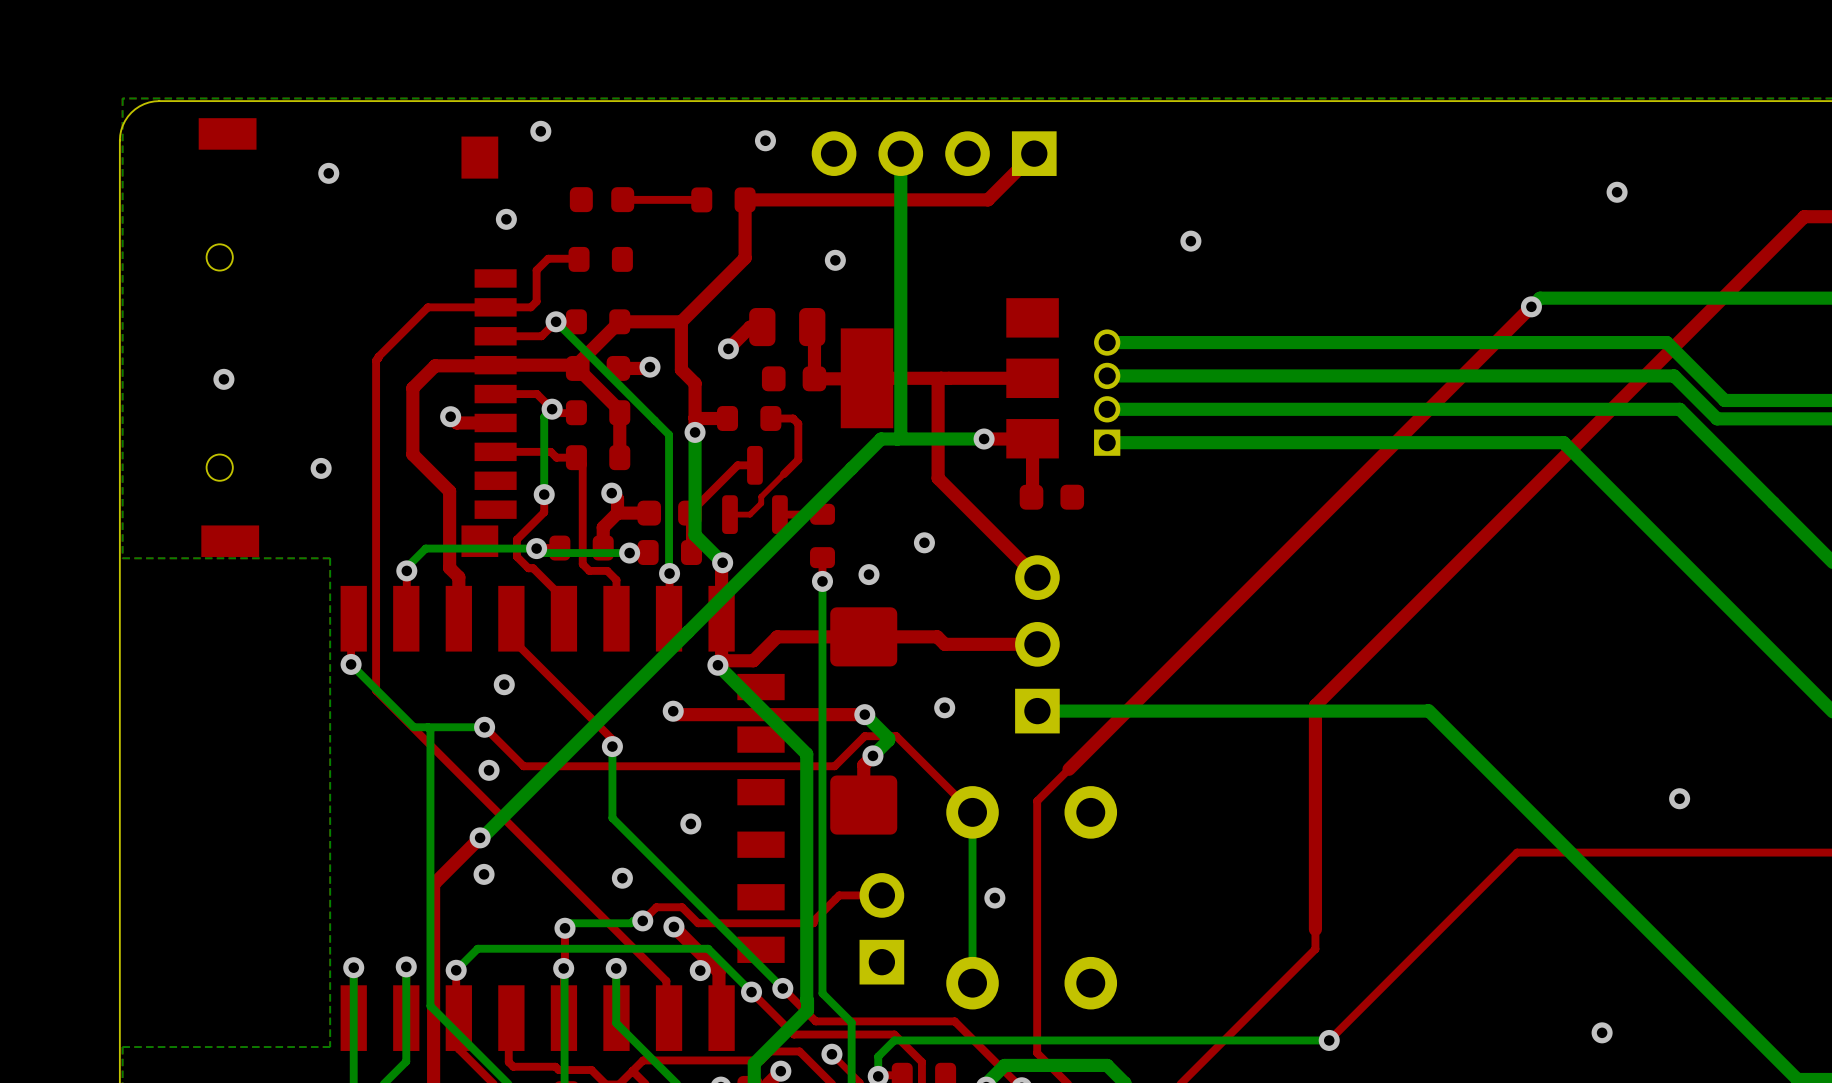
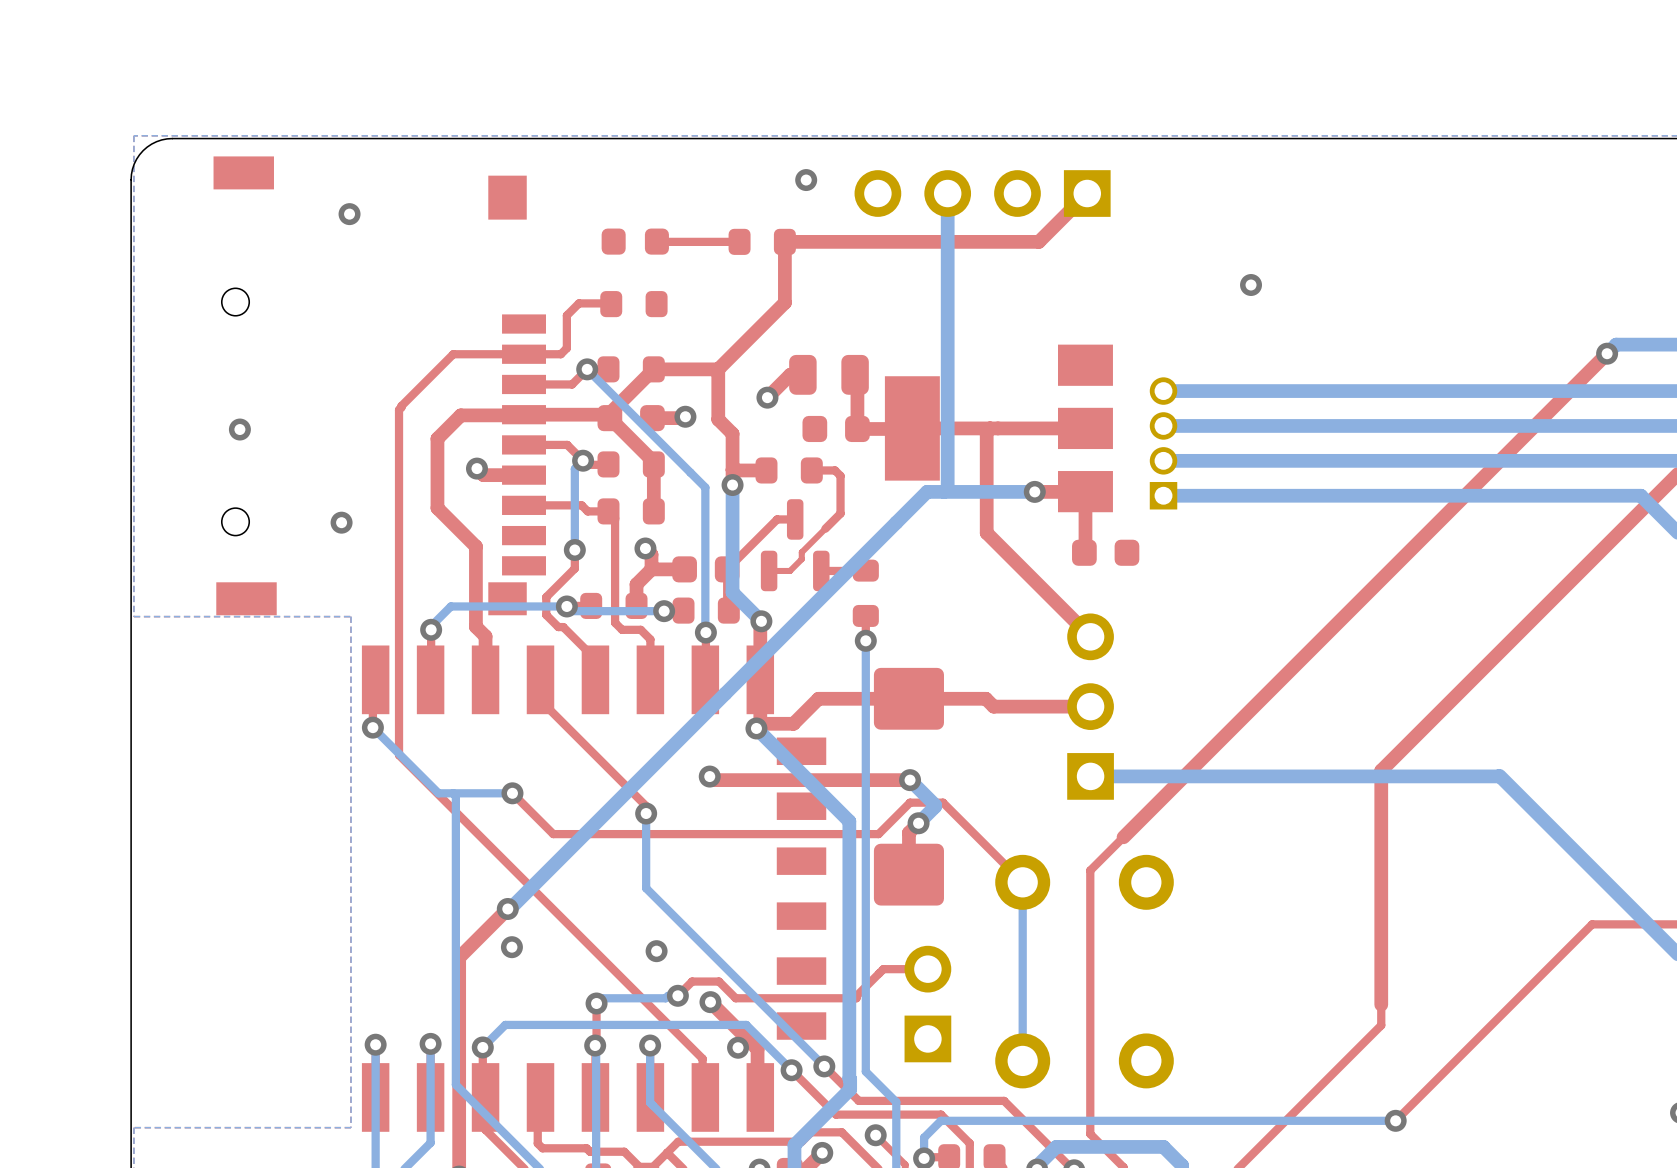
via: (540, 131) -> none
via: (506, 219) -> none
via: (835, 260) -> none
via: (924, 542) -> none
via: (869, 574) -> none
via: (504, 684) -> none
via: (944, 707) -> none
via: (489, 770) -> none
via: (690, 823) -> none
via: (994, 898) -> none

